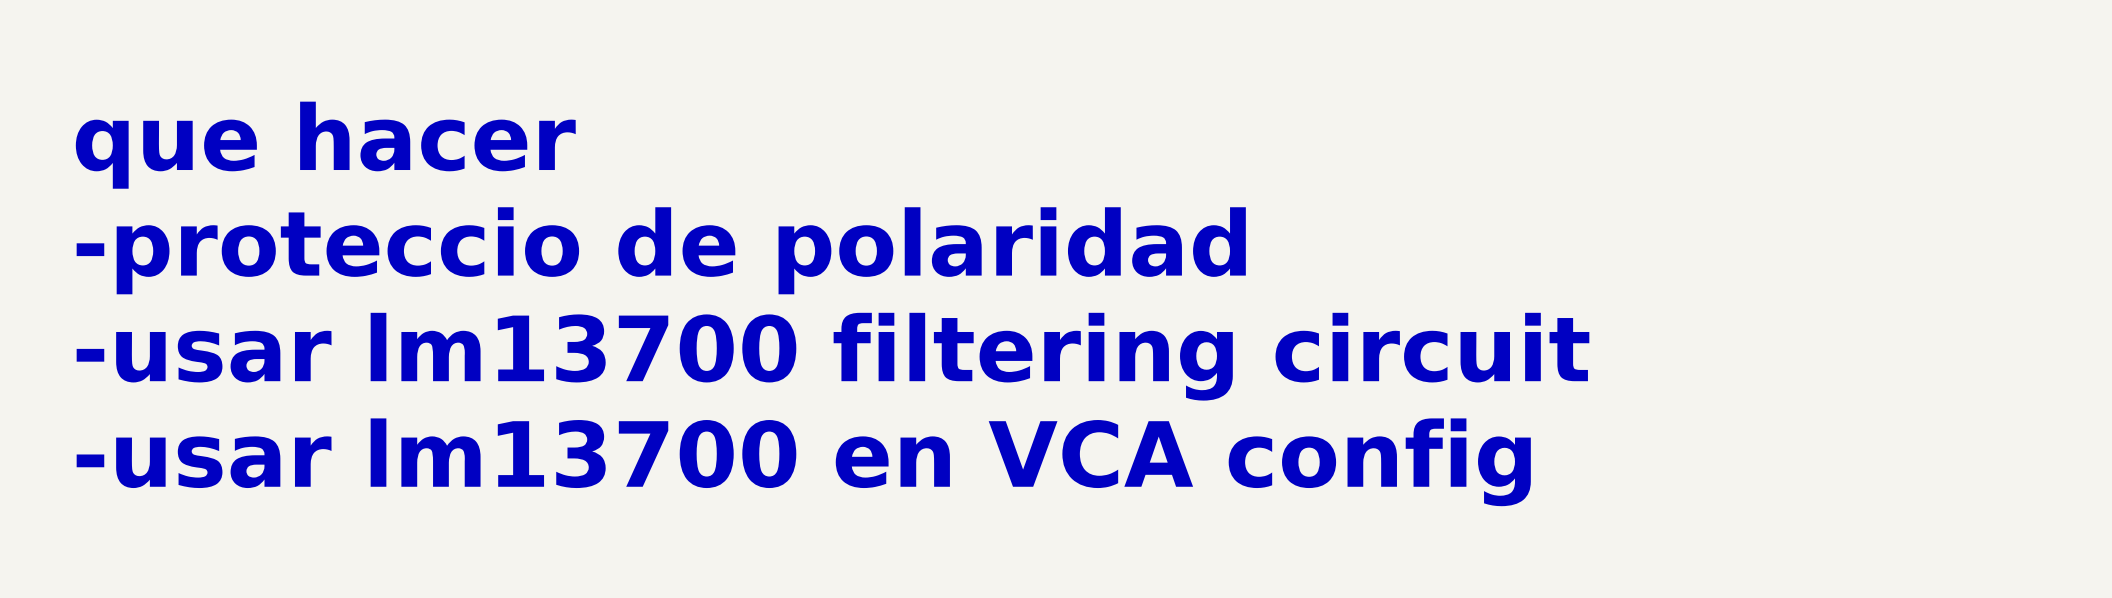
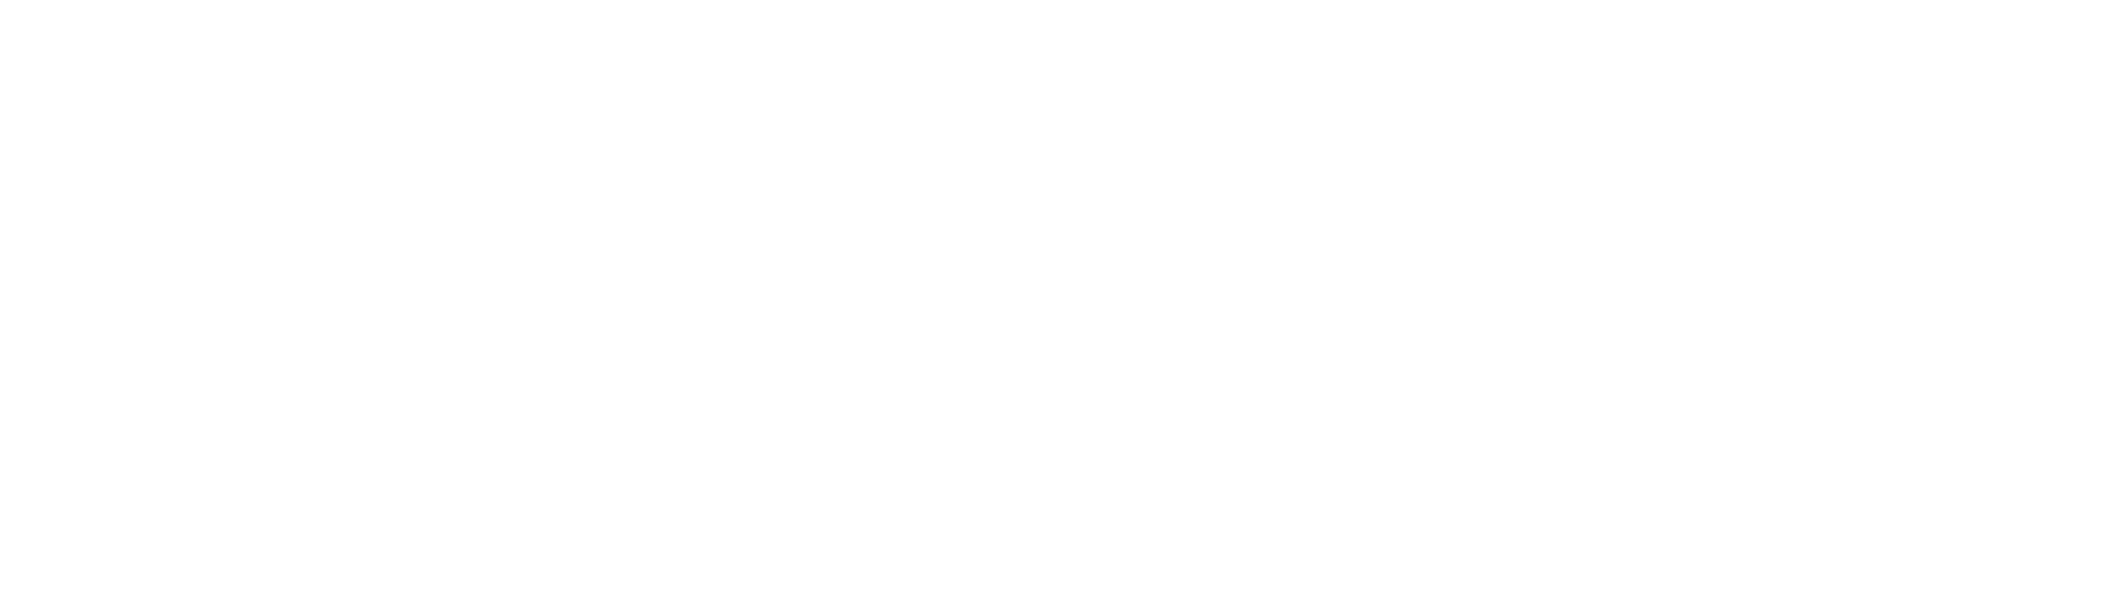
text: que hacer (325, 145) -> none
text: -proteccio de polaridad (661, 250) -> none
text: -usar lm13700 filtering circuit (832, 356) -> none
text: -usar lm13700 en VCA config (803, 462) -> none

